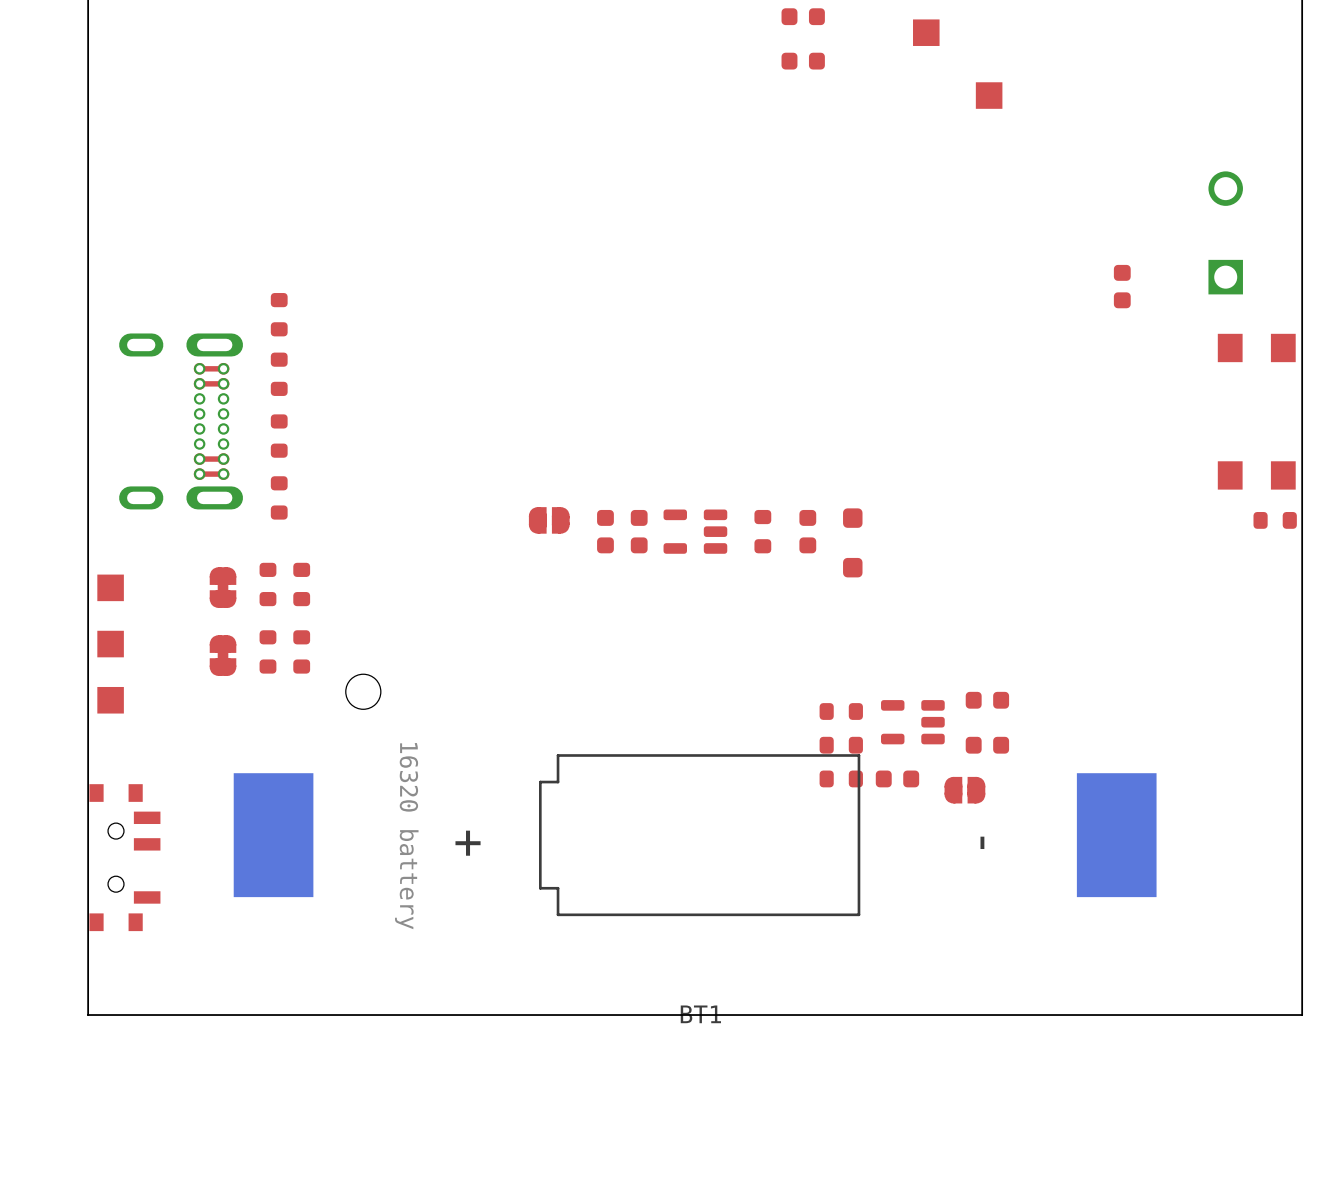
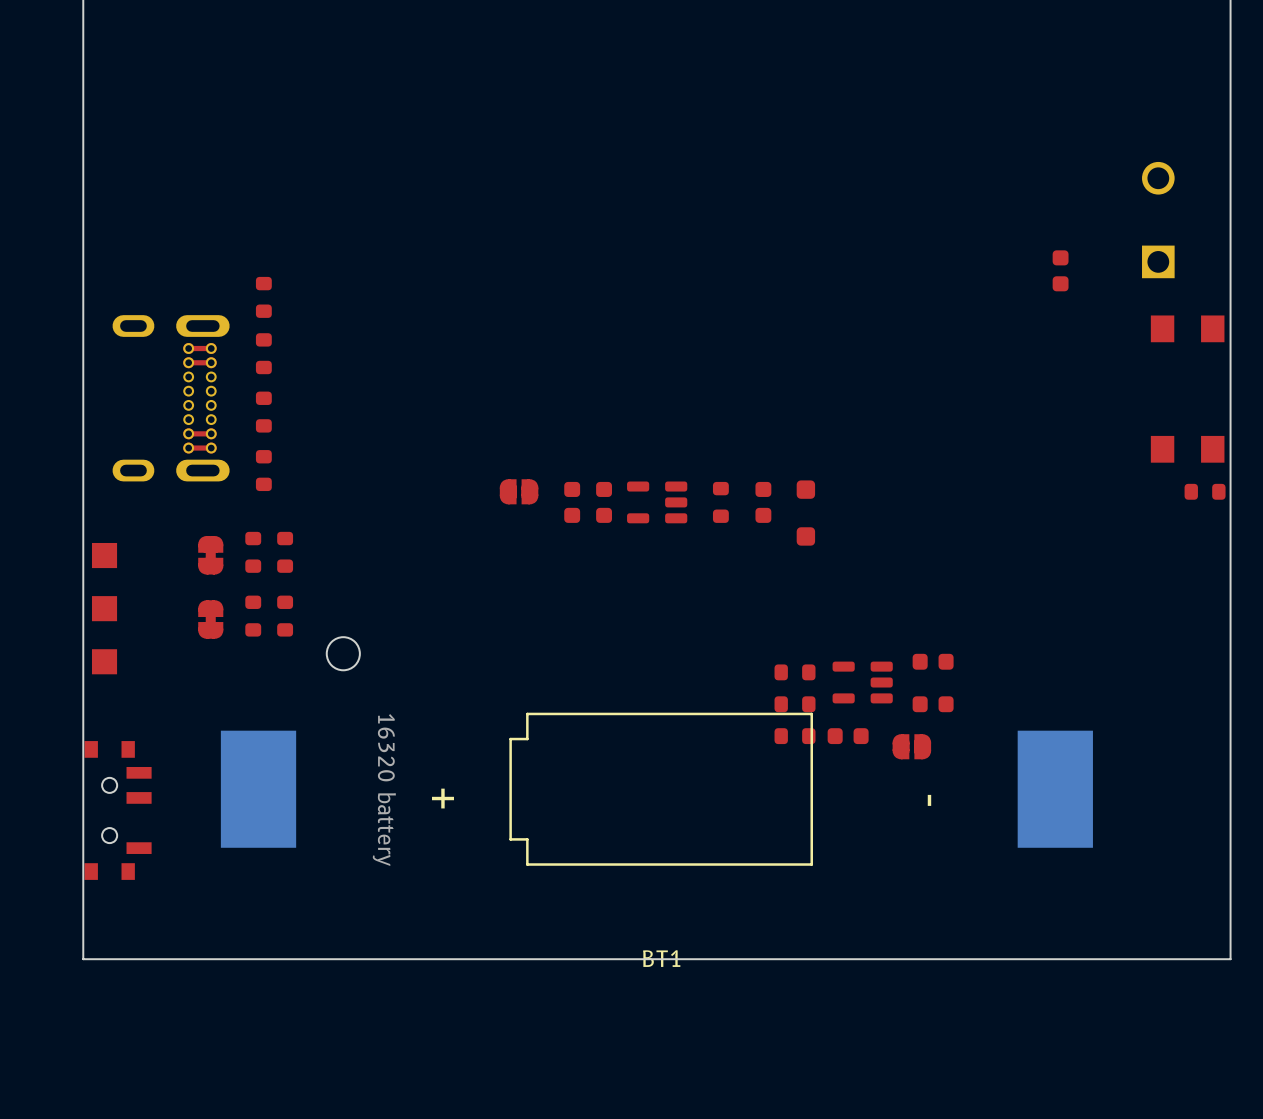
part: (803, 16) -> none
part: (926, 32) -> none
part: (803, 61) -> none
part: (989, 95) -> none

